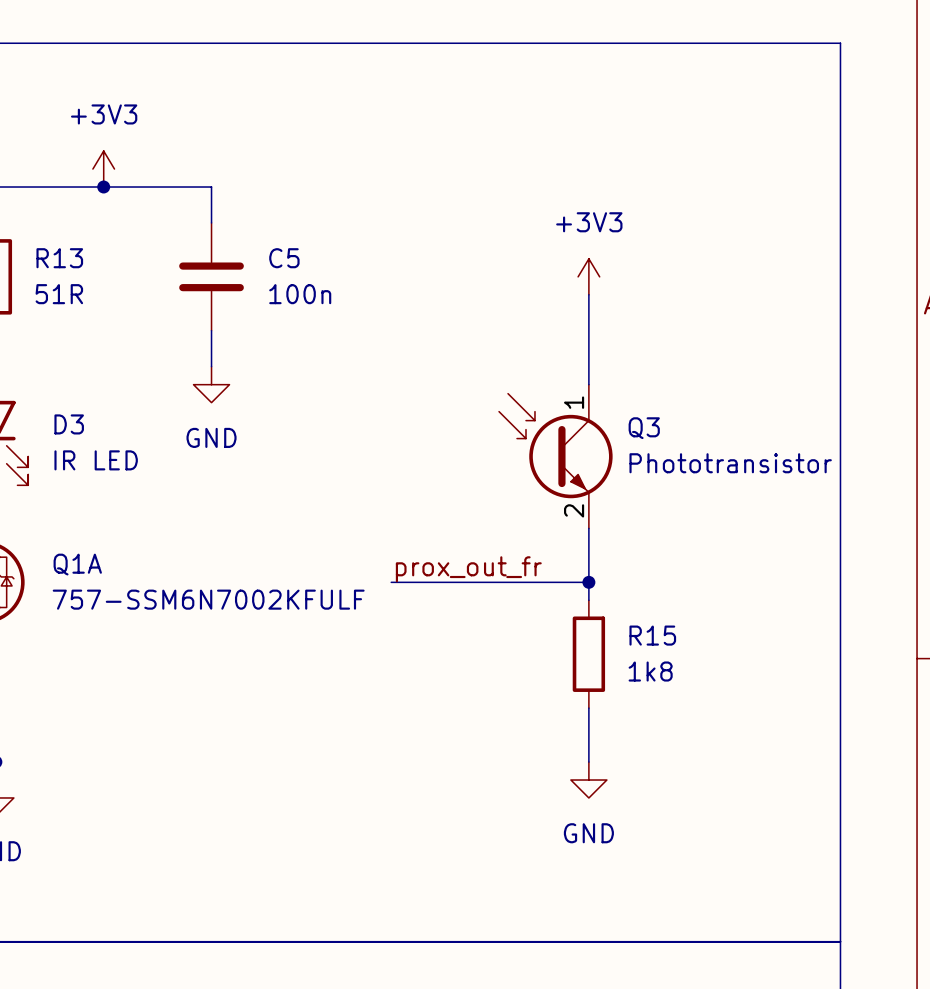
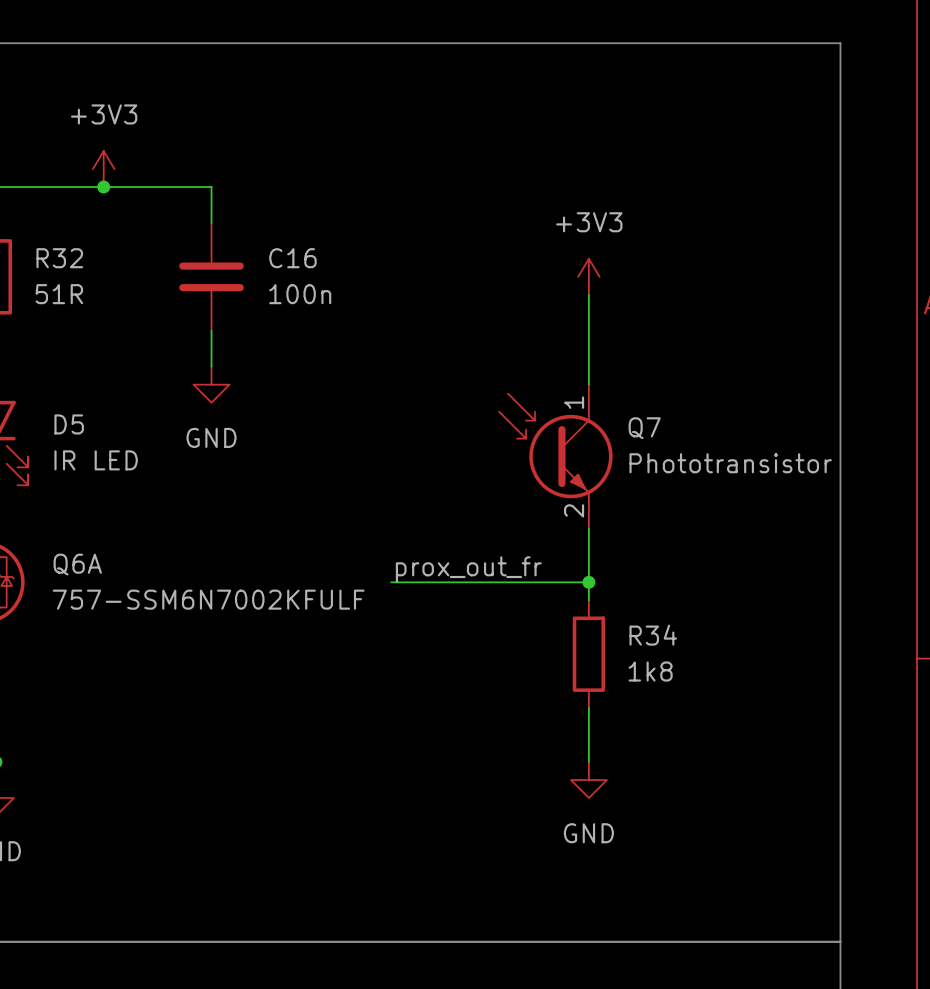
R13 name: R13 (59, 258) -> R32 (59, 258)
C5 name: C5 (284, 258) -> C16 (292, 258)
D3 name: D3 (69, 424) -> D5 (69, 424)
Q3 name: Q3 (644, 428) -> Q7 (644, 428)
Q1A name: Q1A (77, 564) -> Q6A (77, 564)
R15 name: R15 (652, 635) -> R34 (653, 635)

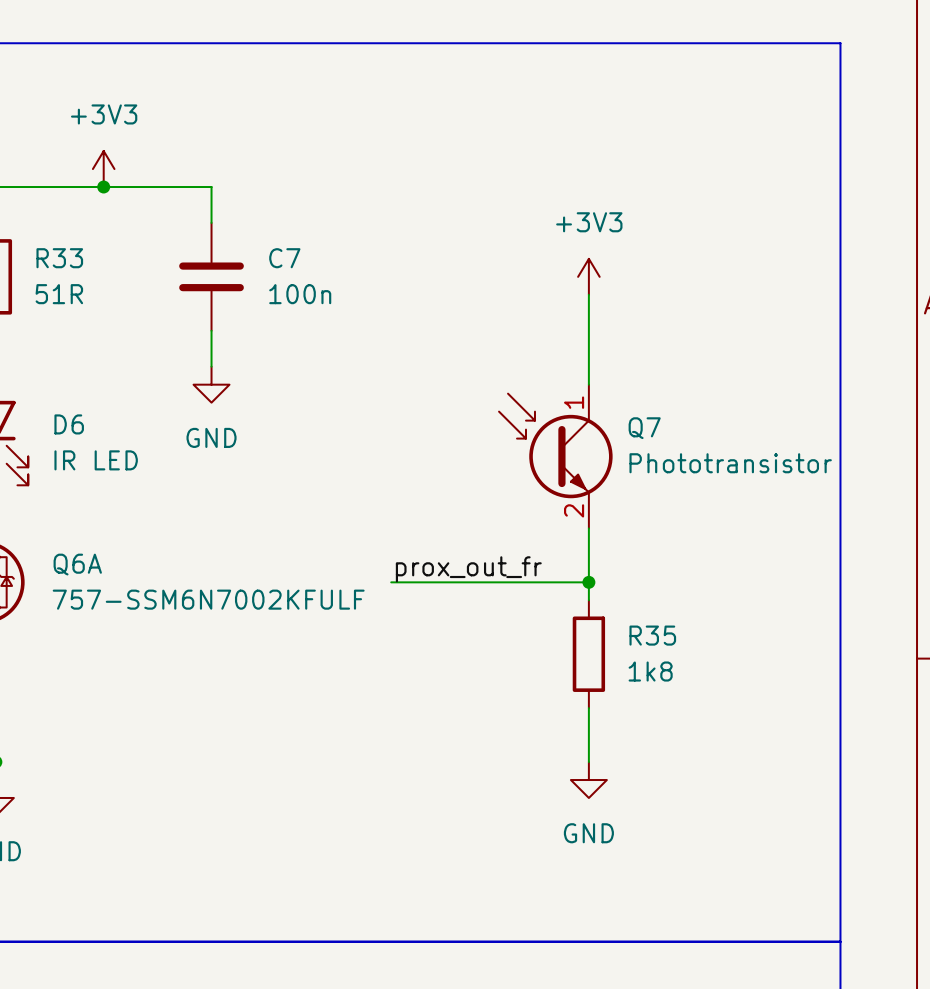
R32 name: R32 (59, 258) -> R33 (59, 258)
C16 name: C16 (292, 258) -> C7 (284, 258)
D5 name: D5 (69, 424) -> D6 (69, 424)
R34 name: R34 (653, 635) -> R35 (652, 635)

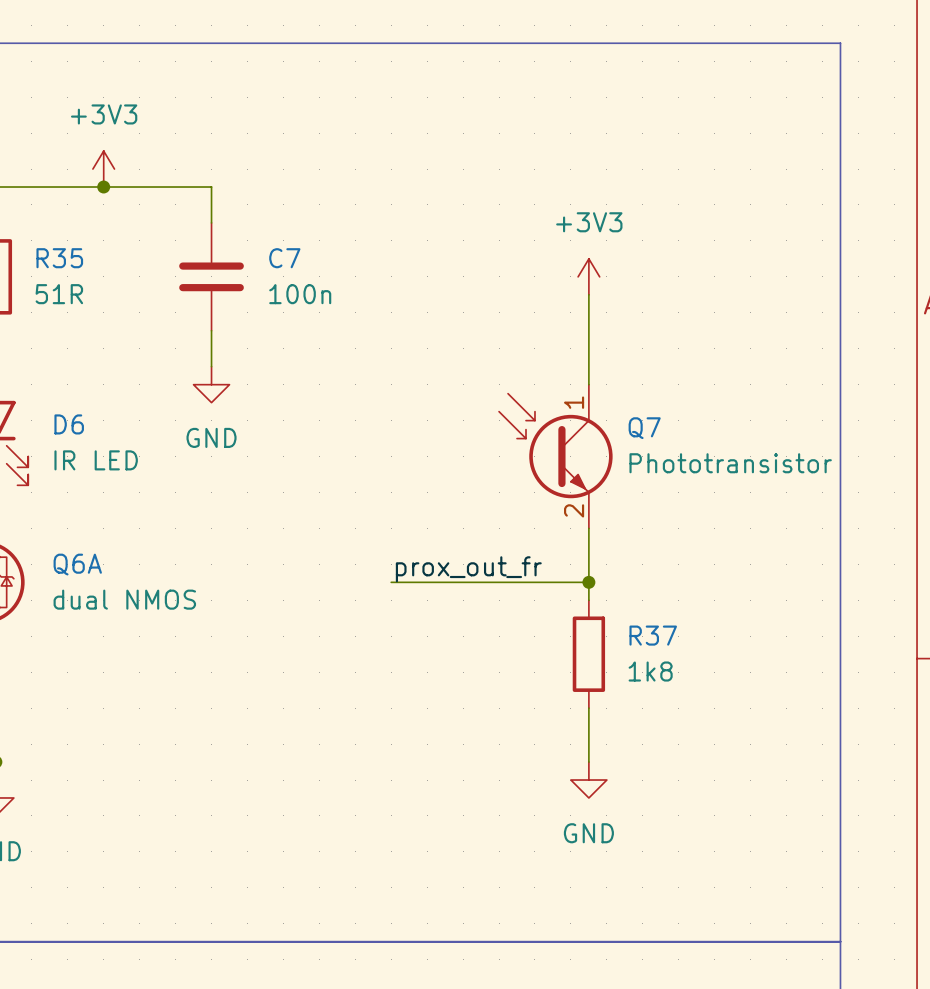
R33 name: R33 (59, 258) -> R35 (59, 258)
Q6A value: 757-SSM6N7002KFULF (208, 599) -> dual NMOS (124, 599)
R35 name: R35 (652, 635) -> R37 (653, 635)

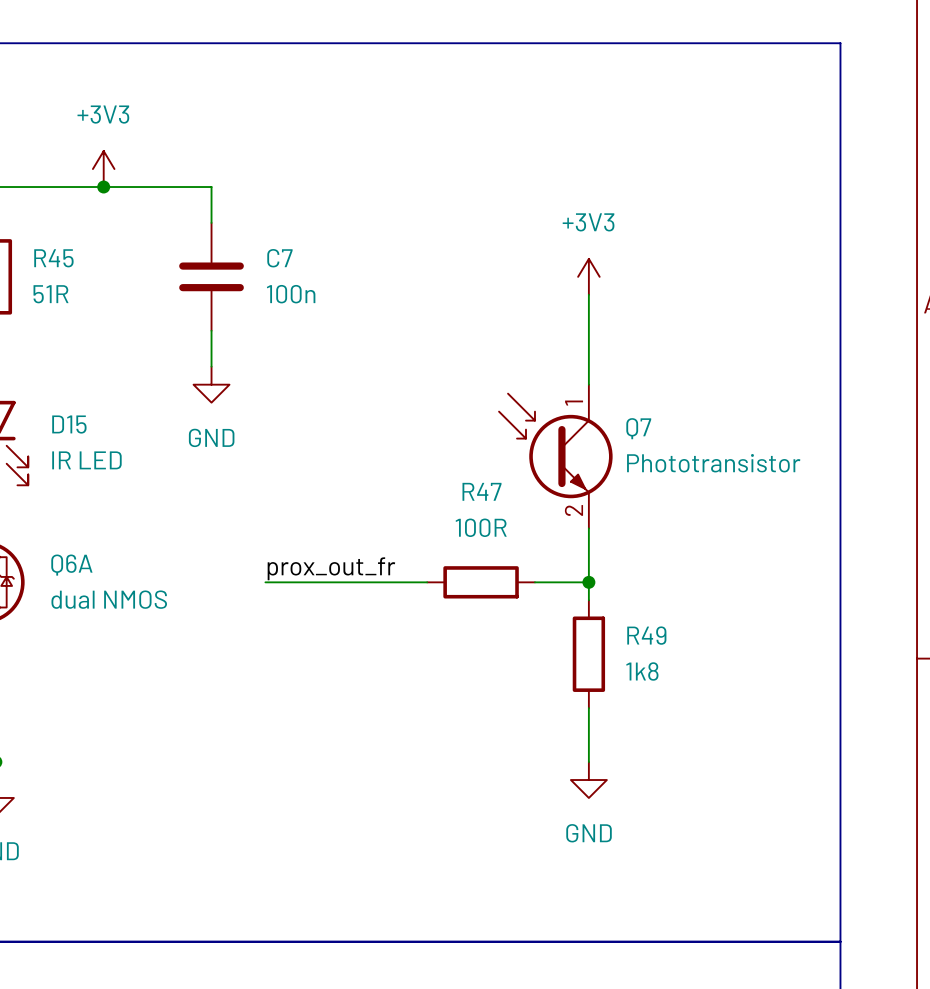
R35 name: R35 (59, 258) -> R45 (53, 258)
D6 name: D6 (69, 424) -> D15 (69, 424)
label position: prox_out_fr (468, 569) -> prox_out_fr (331, 568)
wire: none -> (265, 582) (391, 582)
wire: (427, 582) (534, 582) -> none
R47: none -> 100R (481, 582)
R37 name: R37 (653, 635) -> R49 (646, 635)

